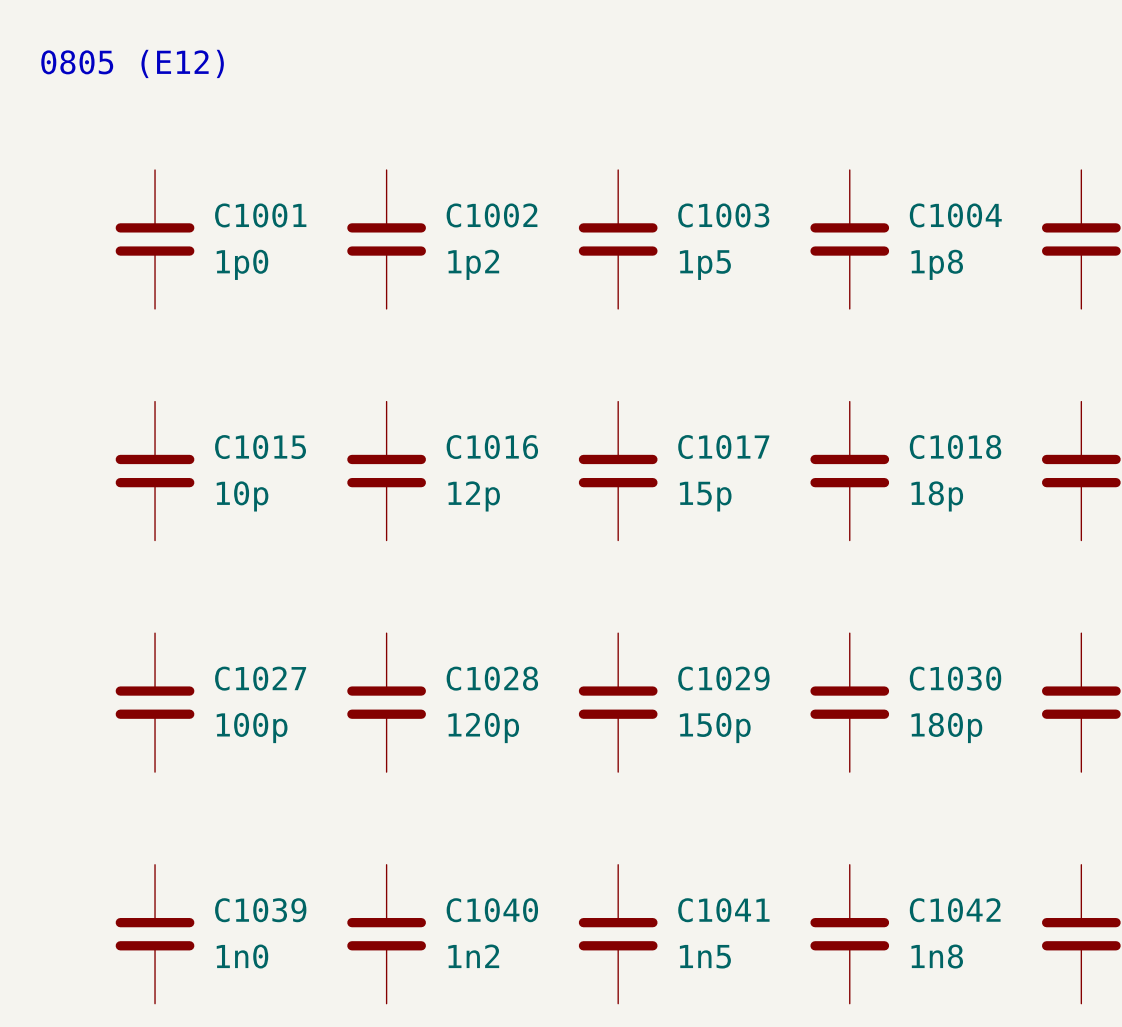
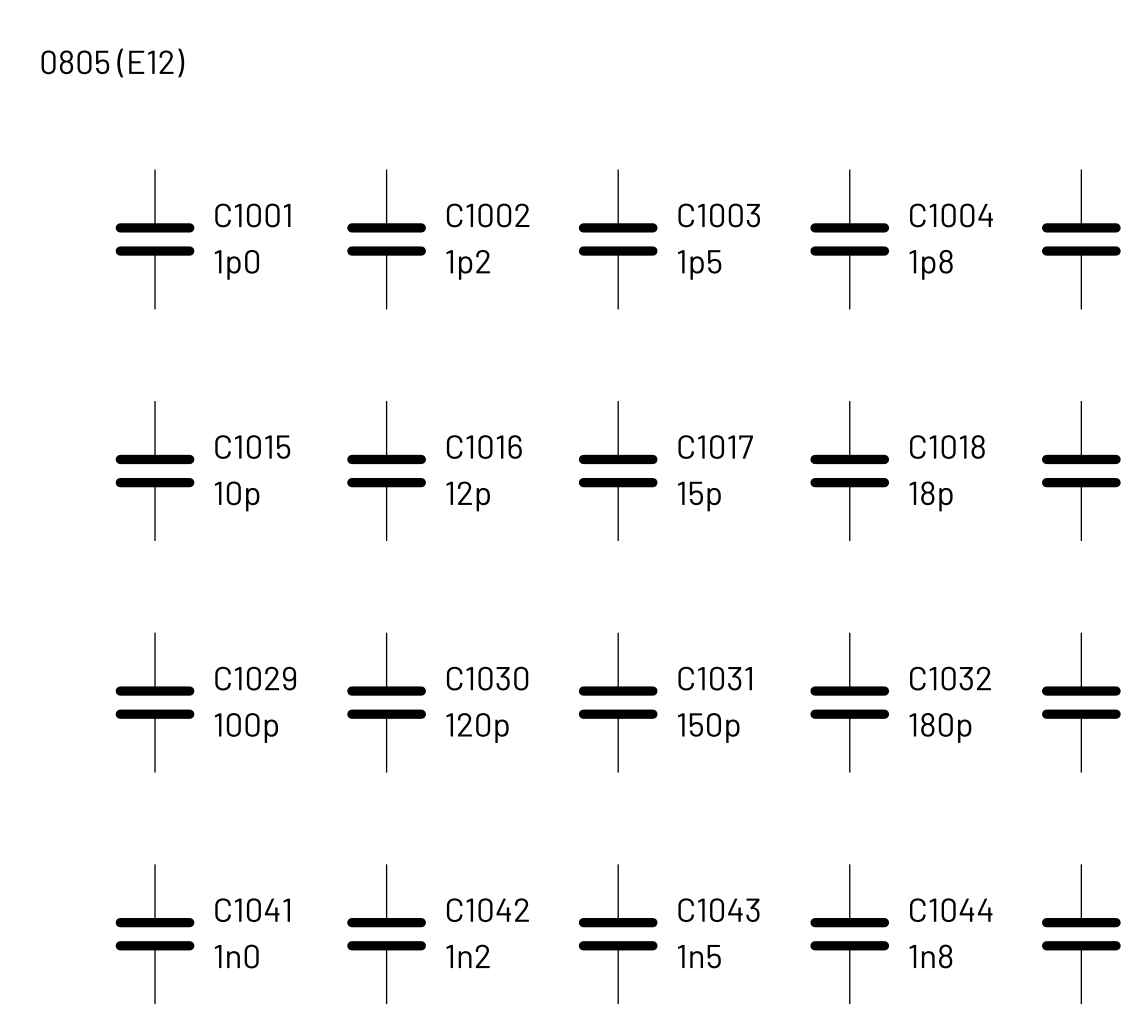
C1027 name: C1027 (260, 678) -> C1029 (255, 678)
C1028 name: C1028 (492, 678) -> C1030 (487, 678)
C1029 name: C1029 (723, 678) -> C1031 (715, 678)
C1030 name: C1030 (955, 678) -> C1032 (950, 678)
C1039 name: C1039 (260, 910) -> C1041 (252, 910)
C1040 name: C1040 (492, 910) -> C1042 (487, 910)
C1041 name: C1041 (723, 910) -> C1043 (719, 910)
C1042 name: C1042 (955, 910) -> C1044 (951, 910)

